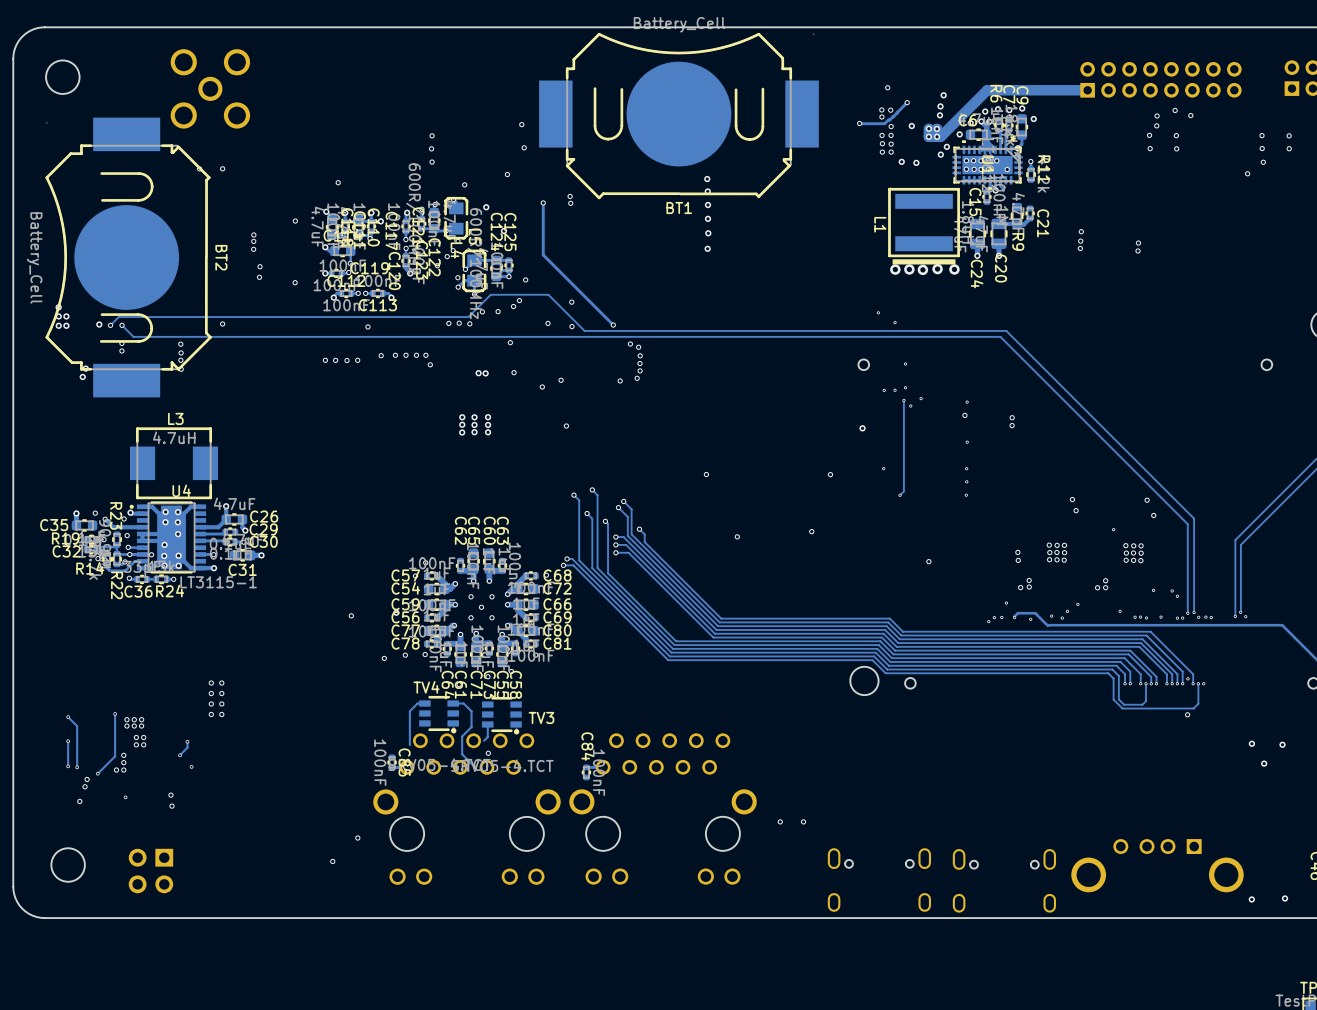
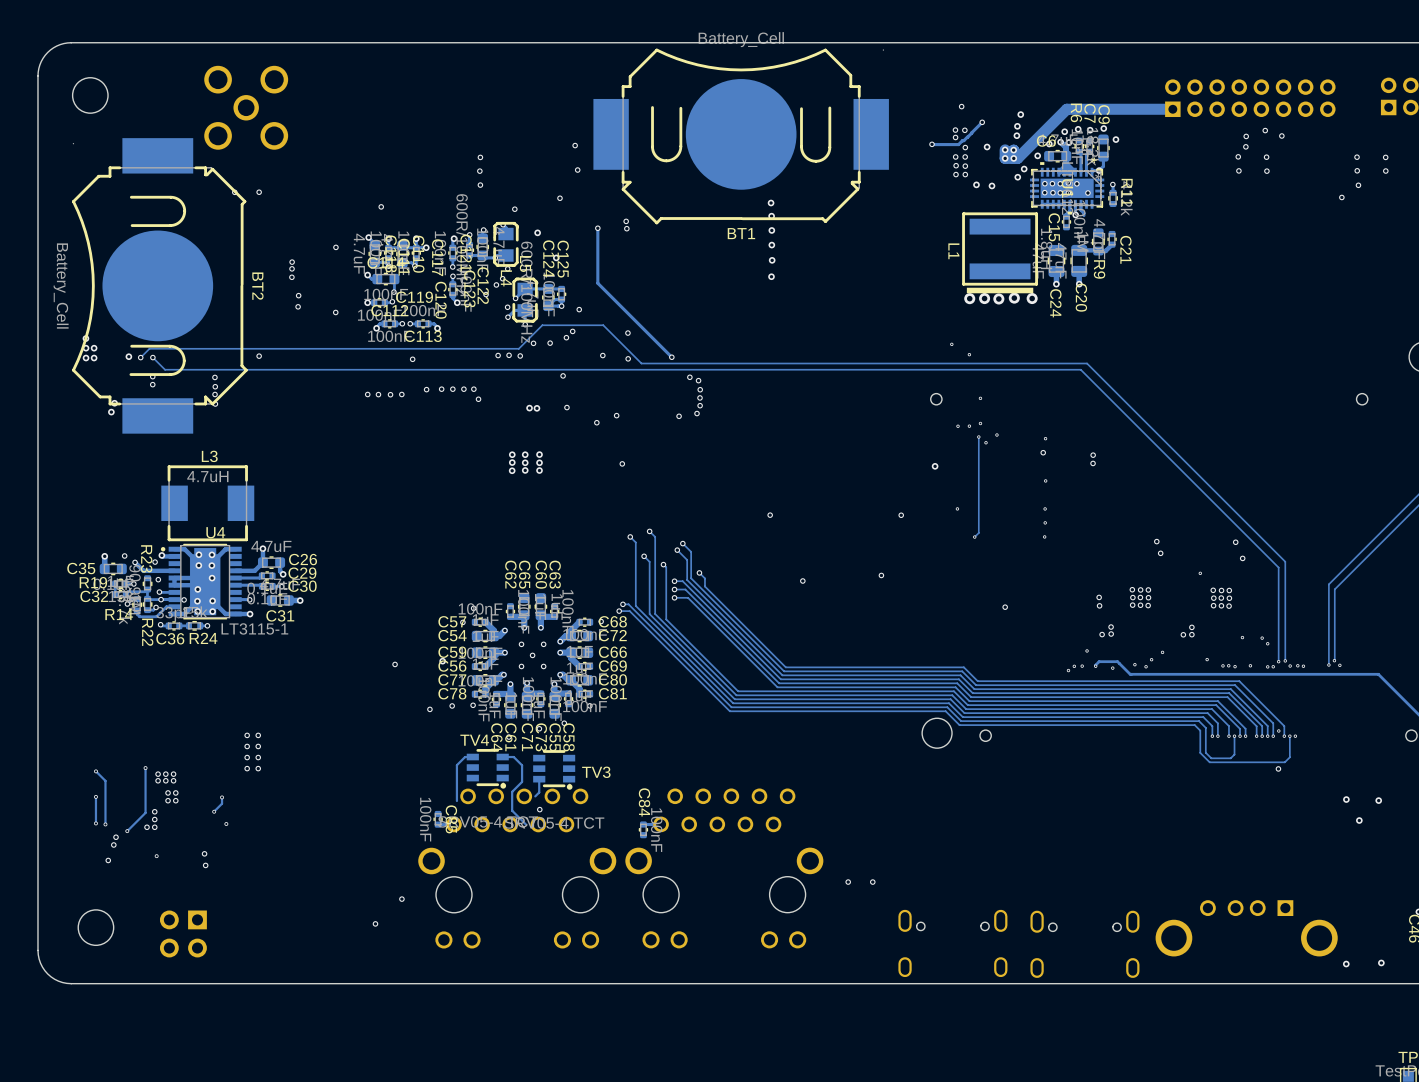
via: (1081, 231) -> none
via: (1080, 241) -> none
via: (1138, 243) -> none
via: (1080, 248) -> none
via: (1138, 251) -> none

